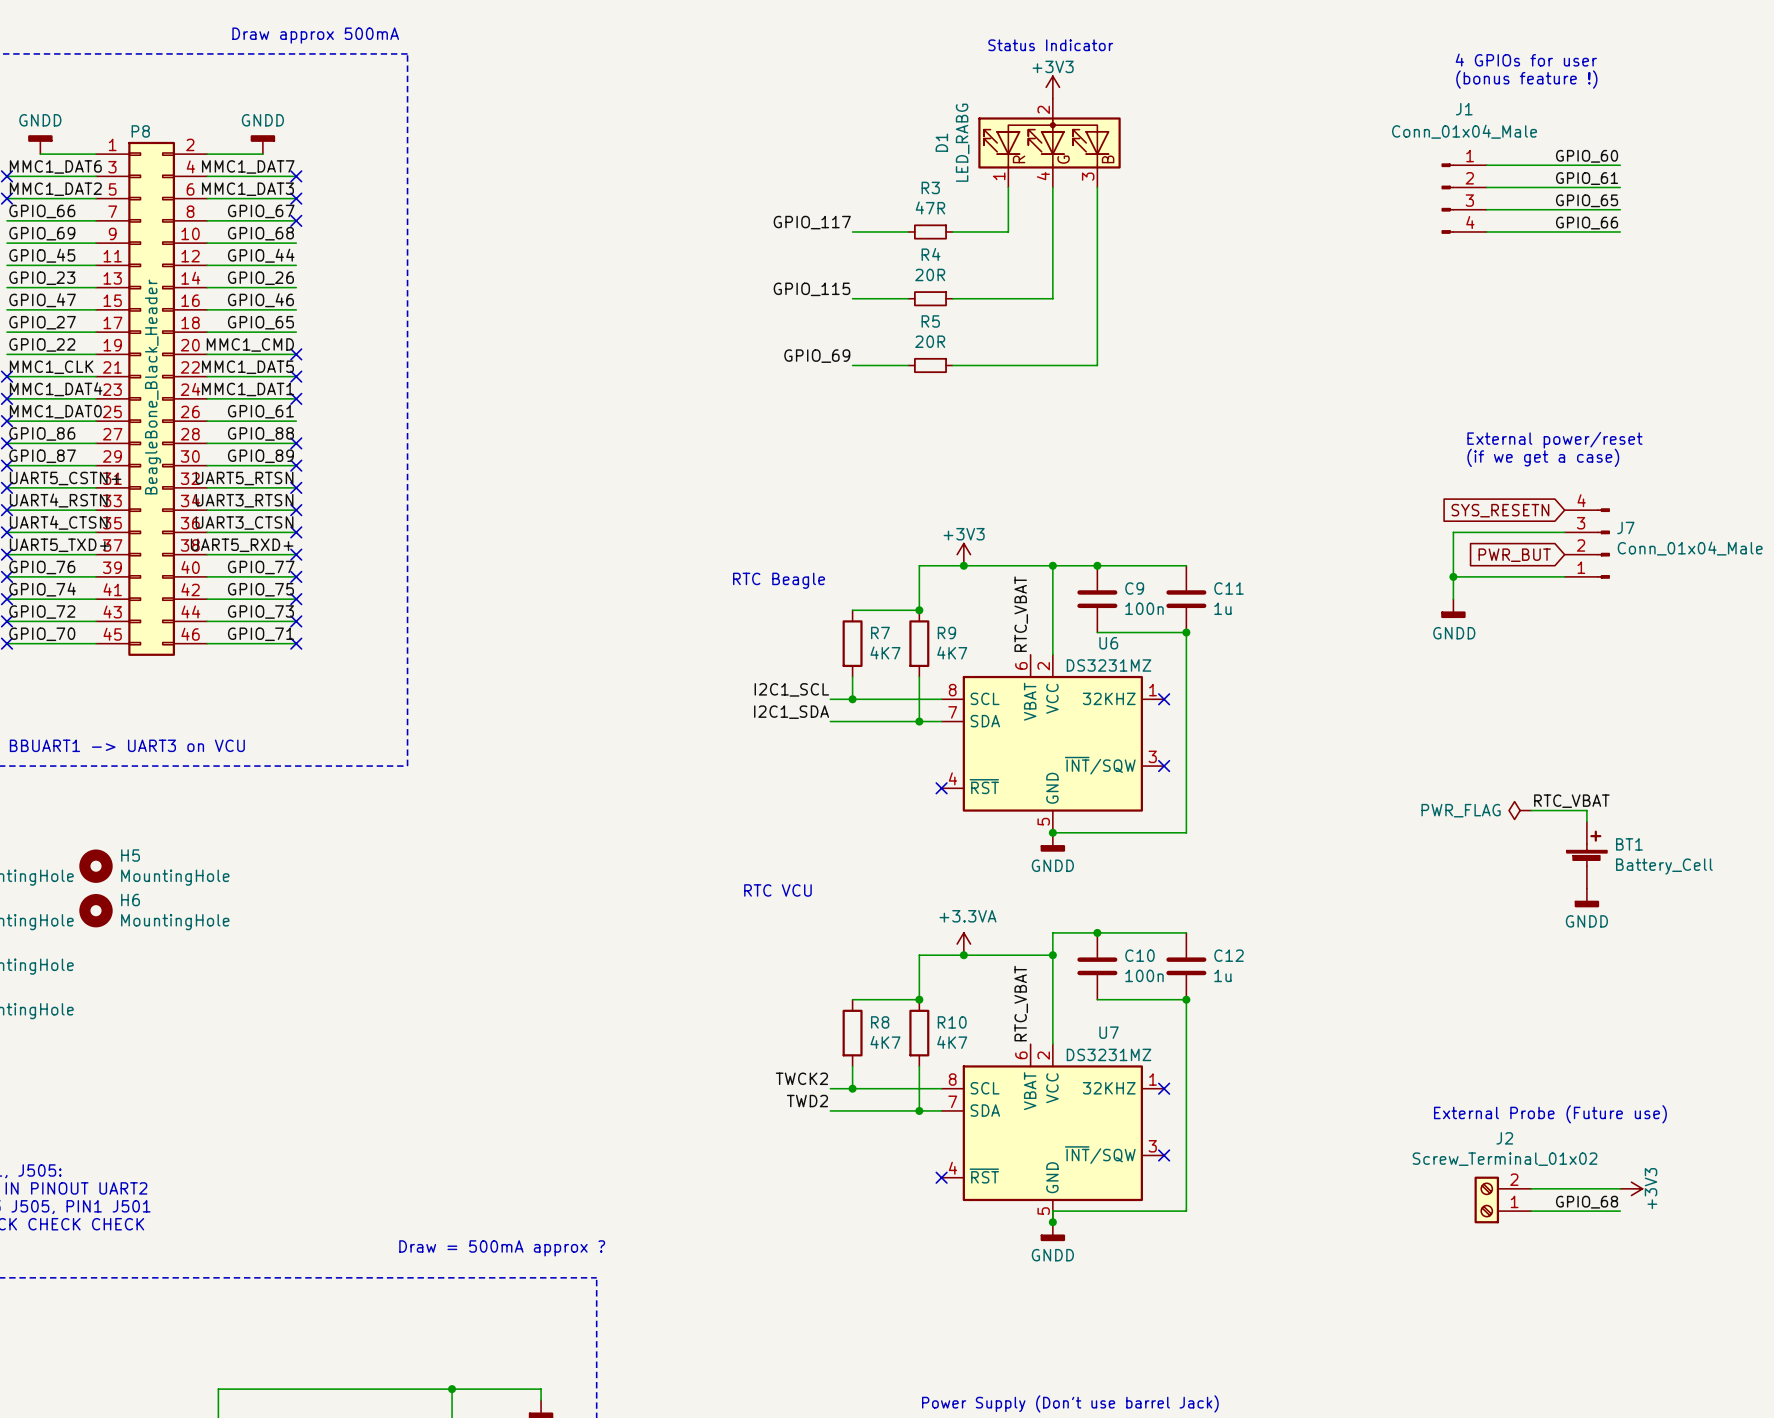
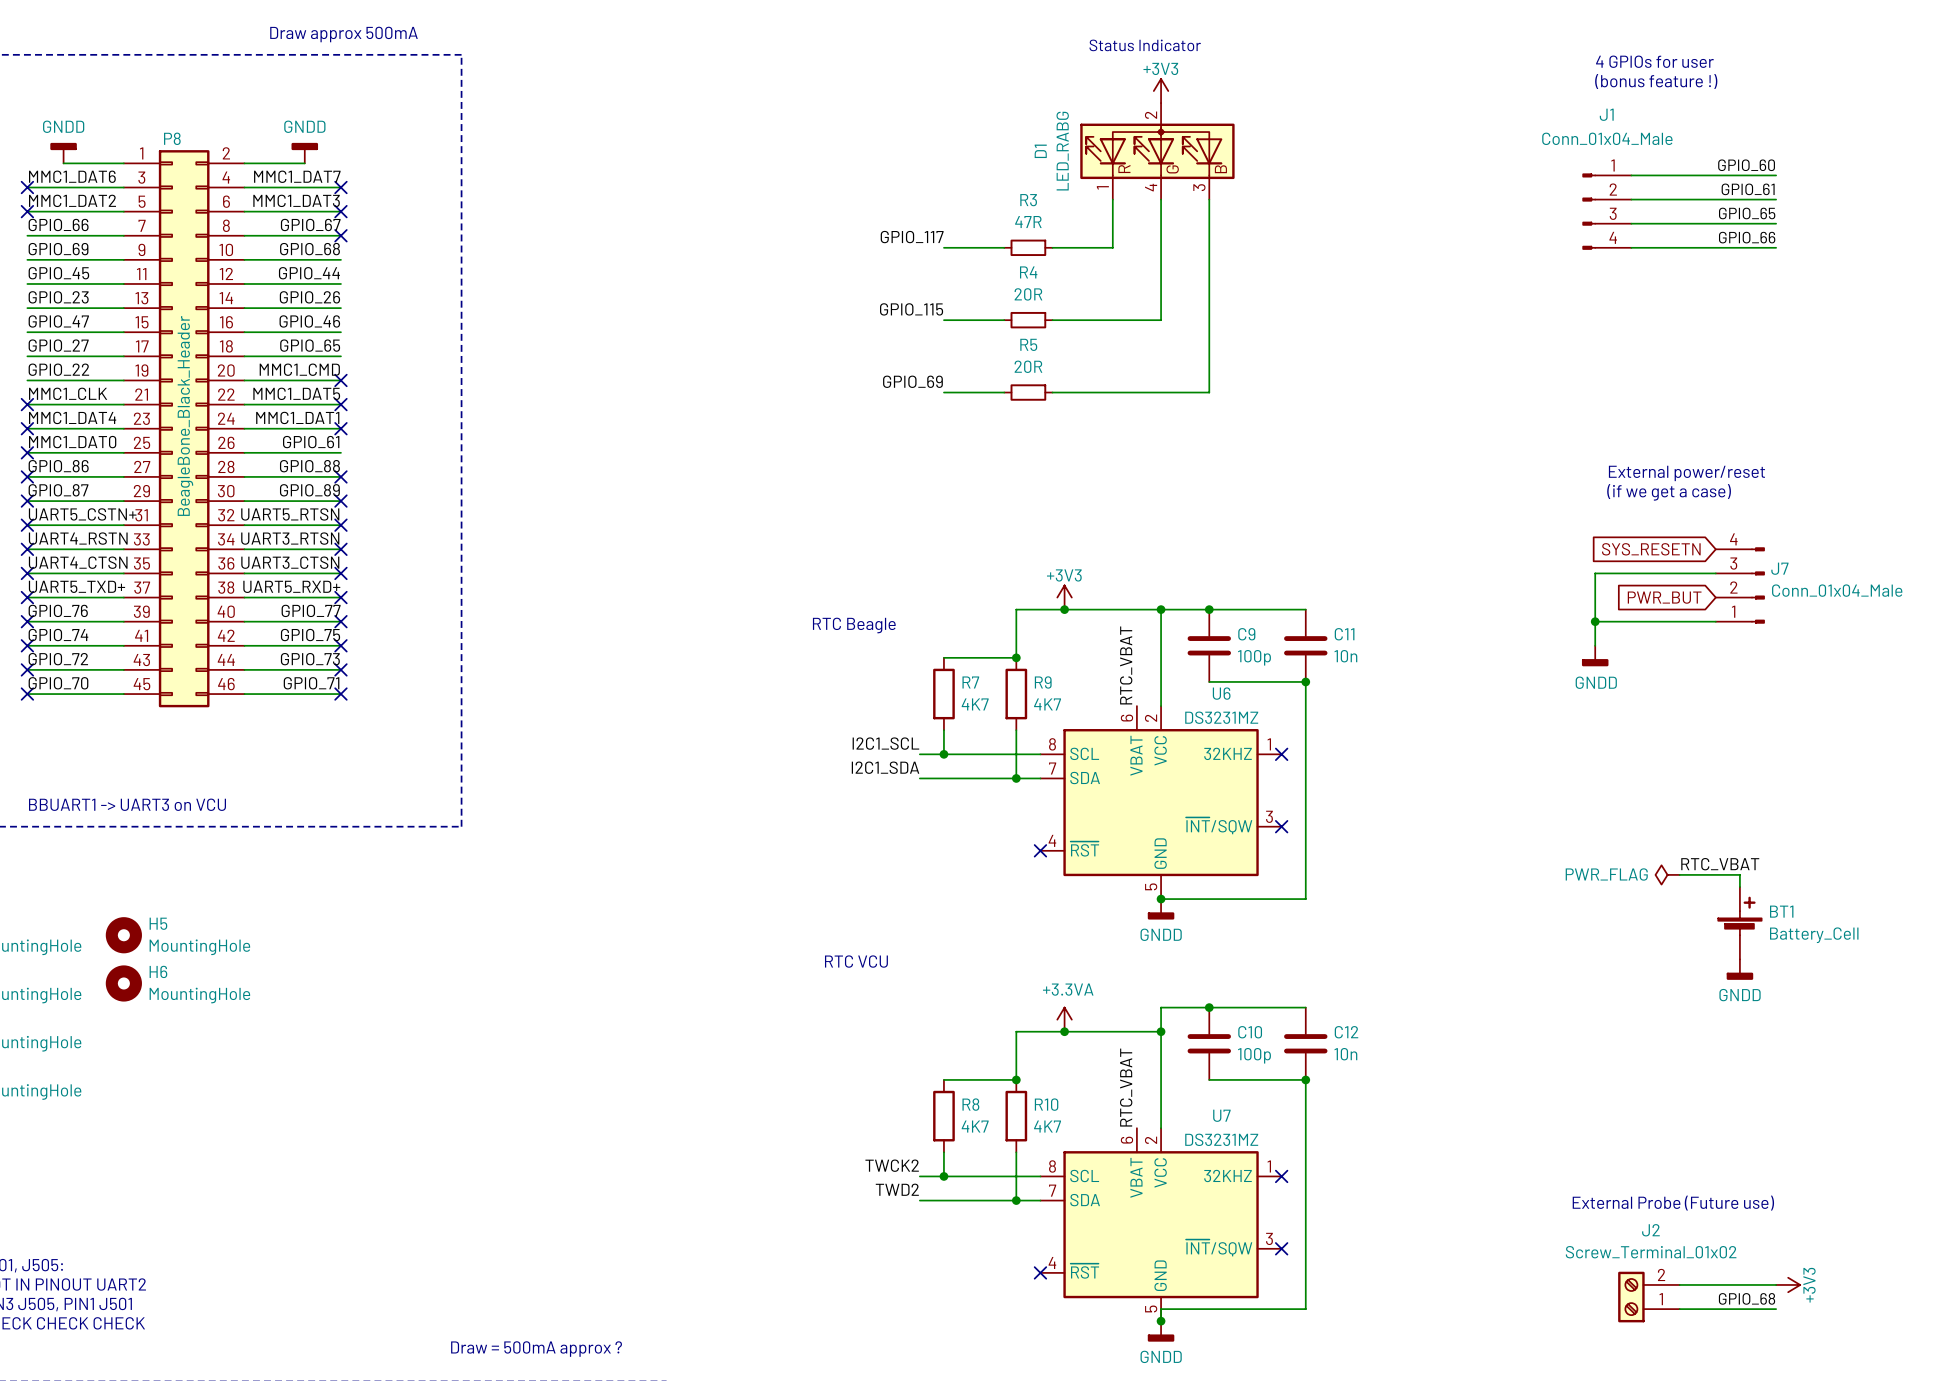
C9 value: 100n (1144, 608) -> 100p (1254, 657)
C11 value: 1u (1222, 608) -> 10n (1345, 656)
C10 value: 100n (1144, 975) -> 100p (1254, 1055)
C12 value: 1u (1222, 975) -> 10n (1345, 1054)

